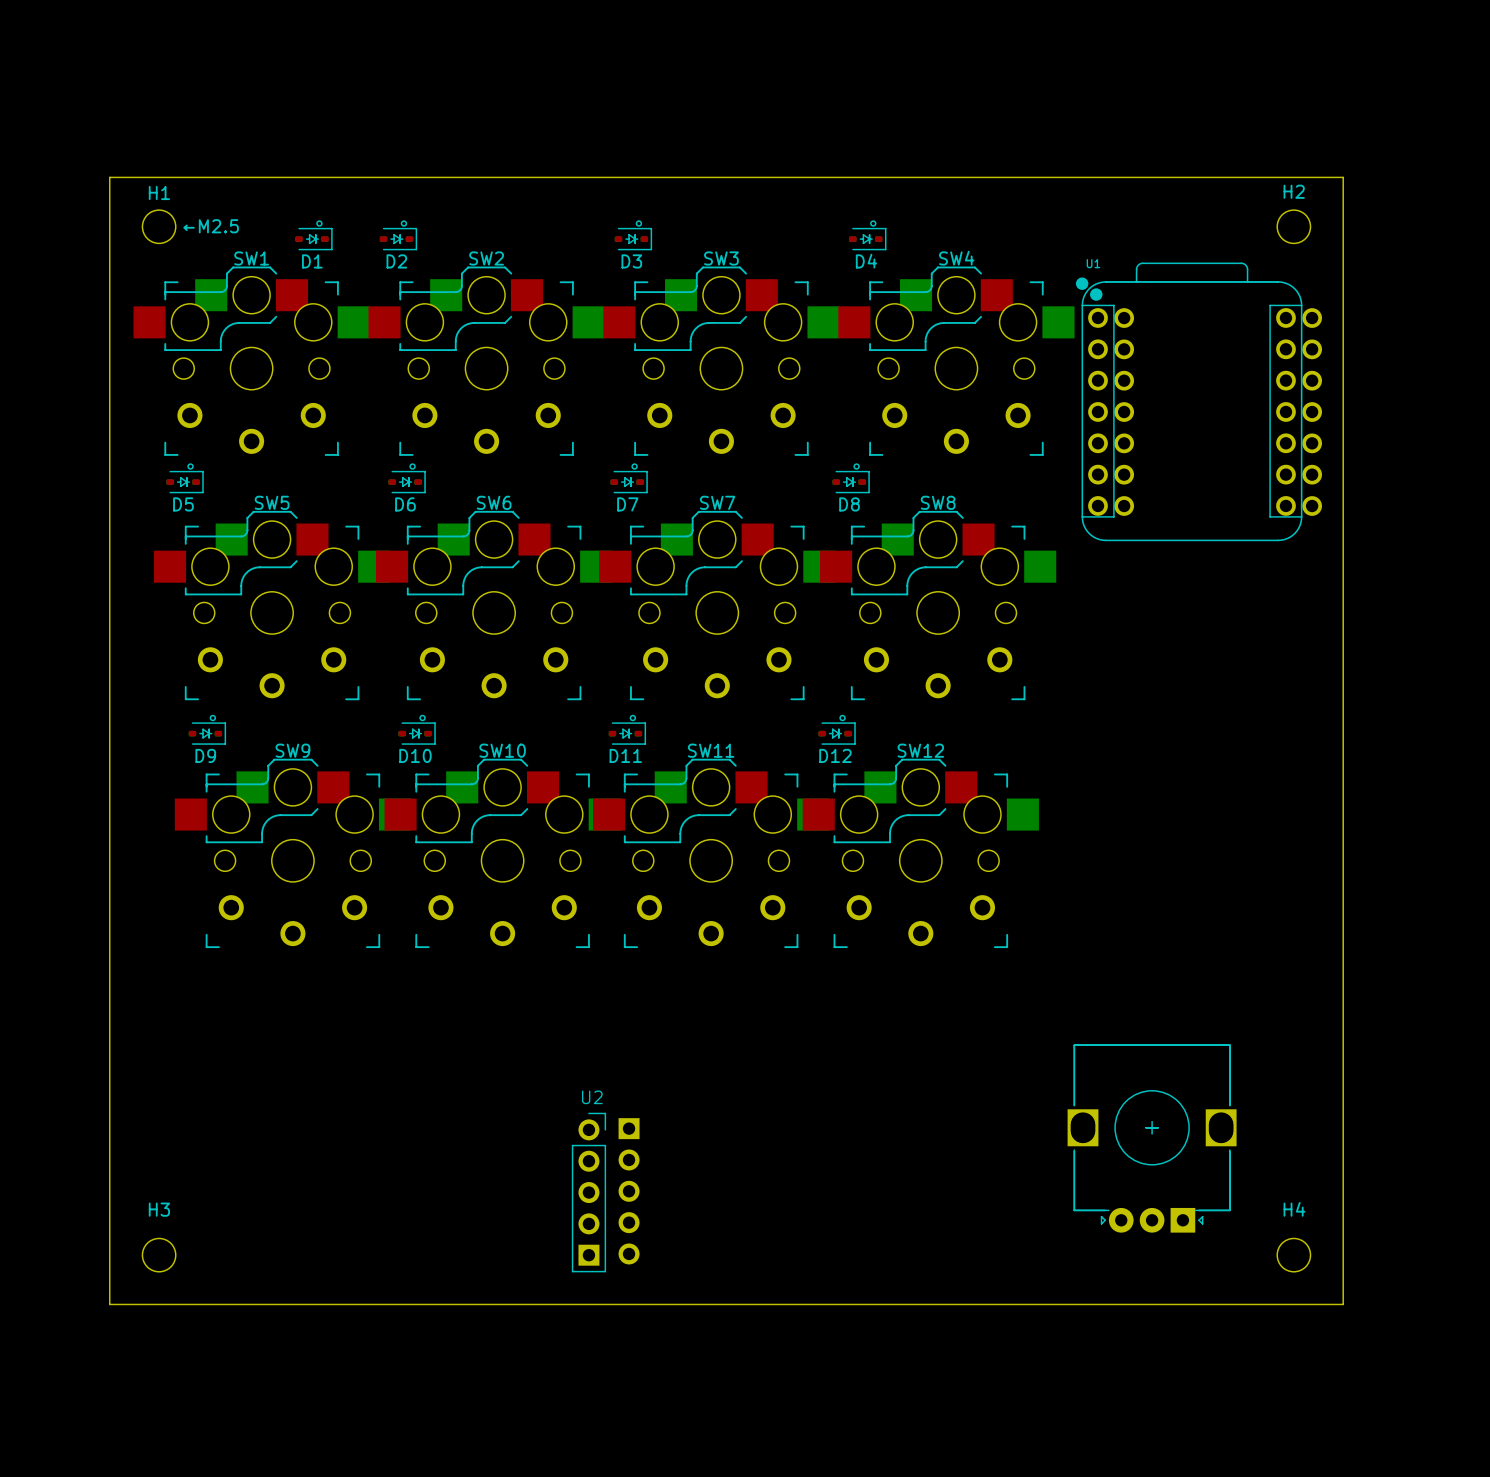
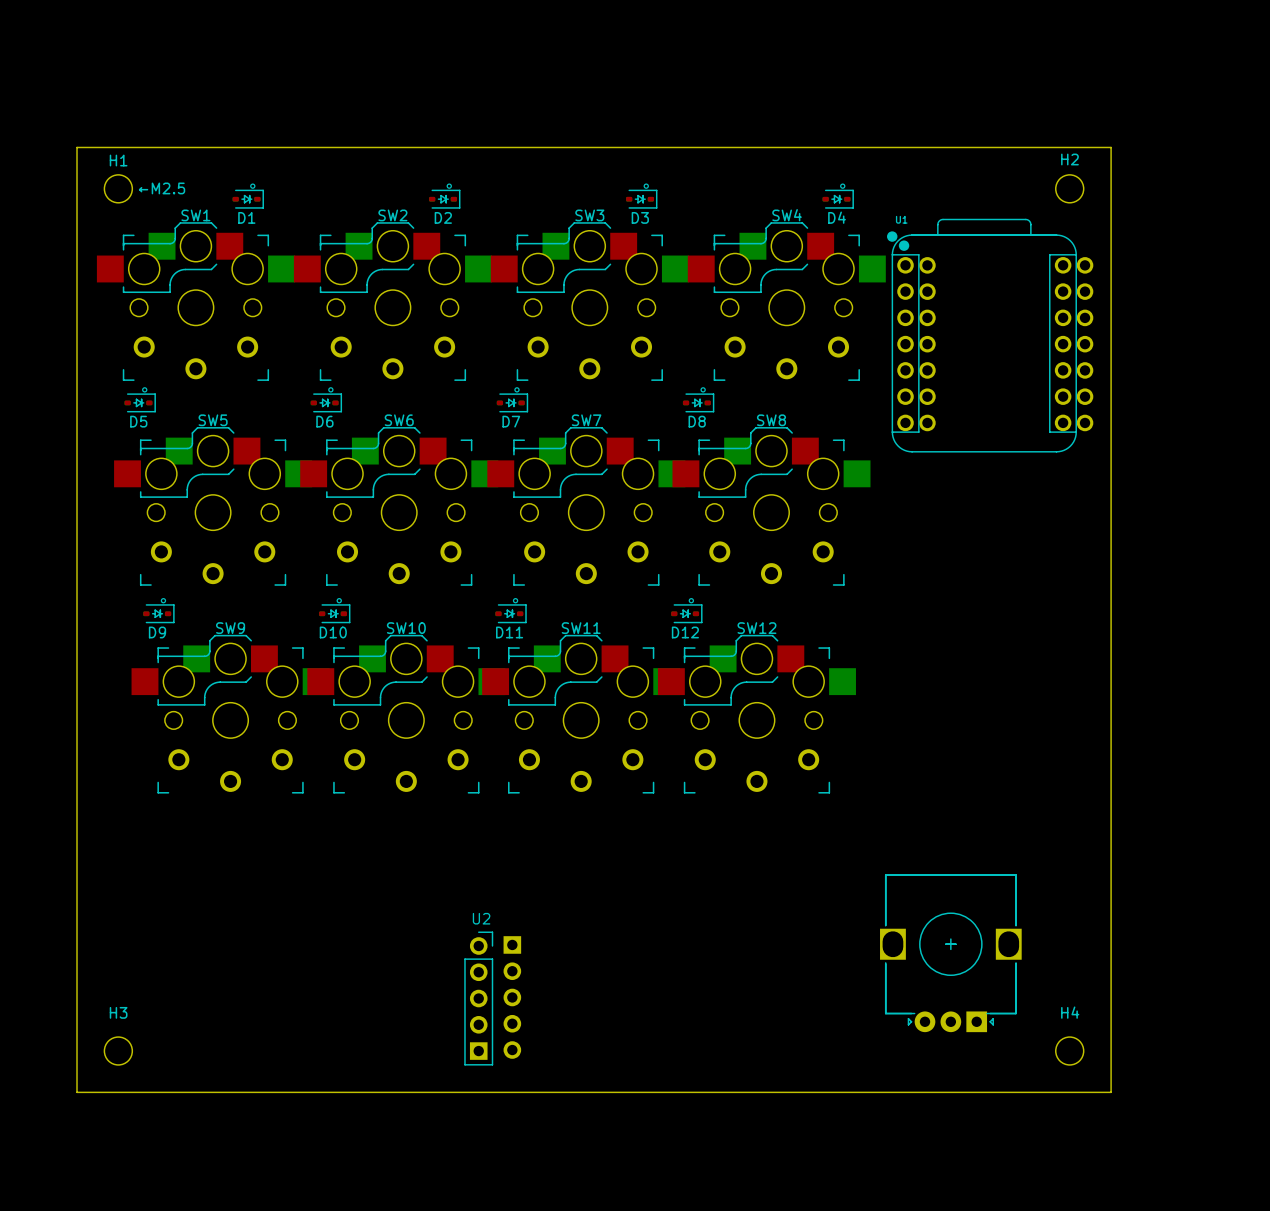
D2 position: (398, 235) -> (444, 196)
D3 position: (633, 235) -> (641, 196)
D4 position: (867, 235) -> (838, 196)

